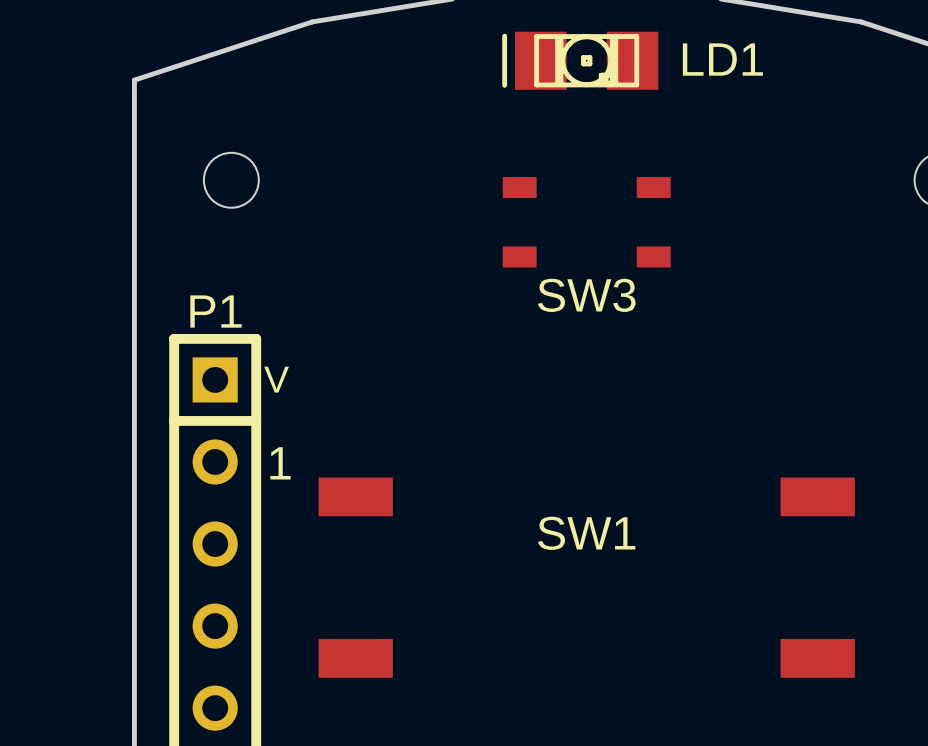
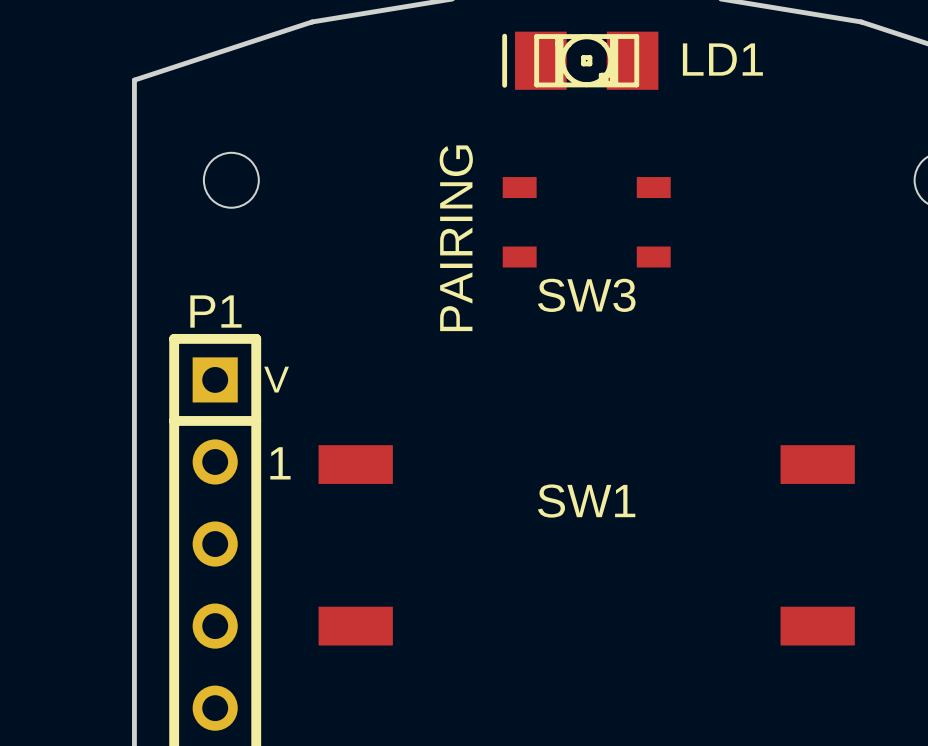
text: none -> PAIRING (456, 238)
SW1 position: (586, 577) -> (586, 545)

